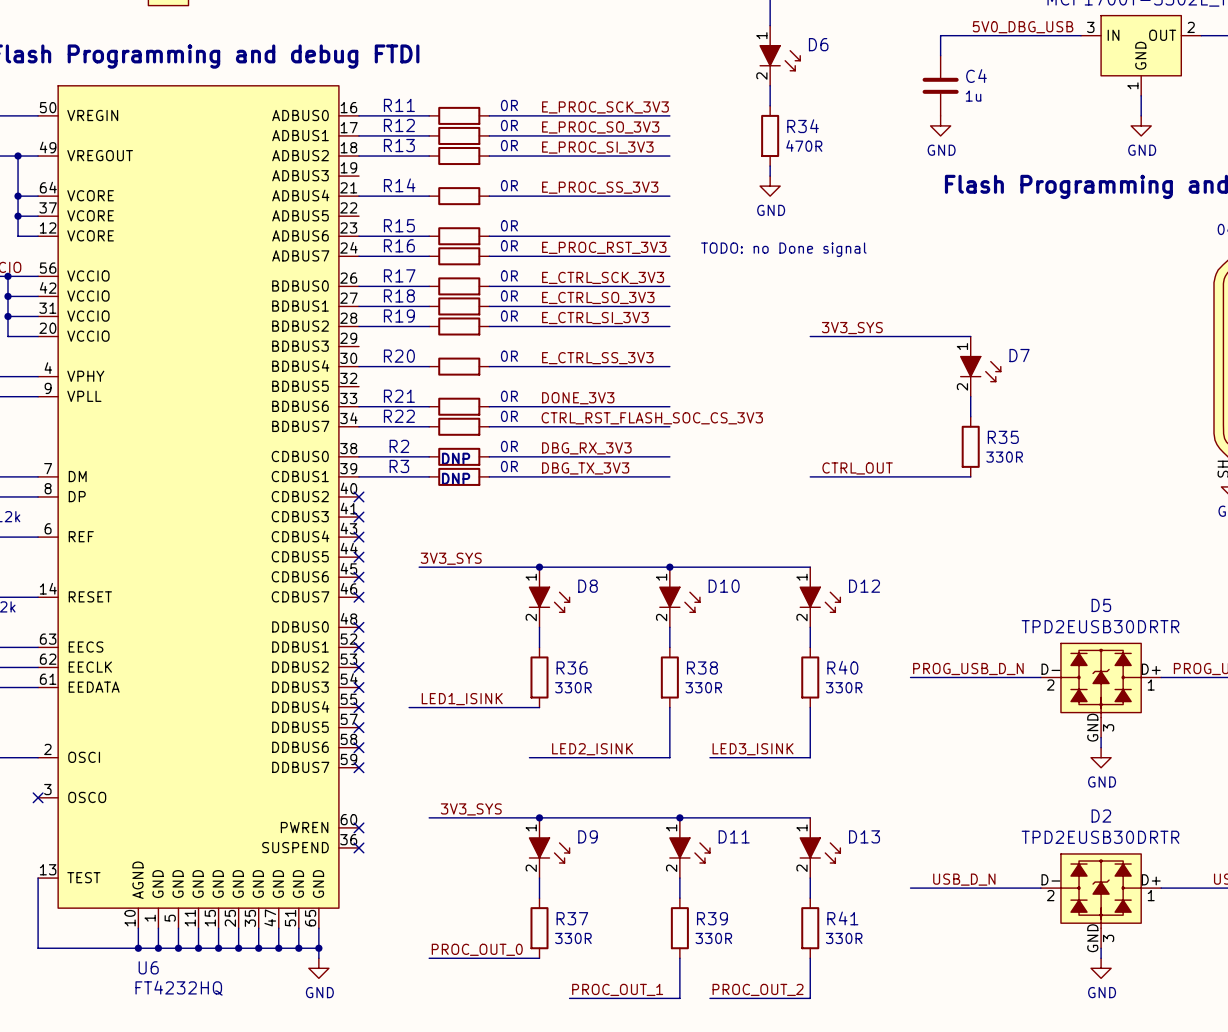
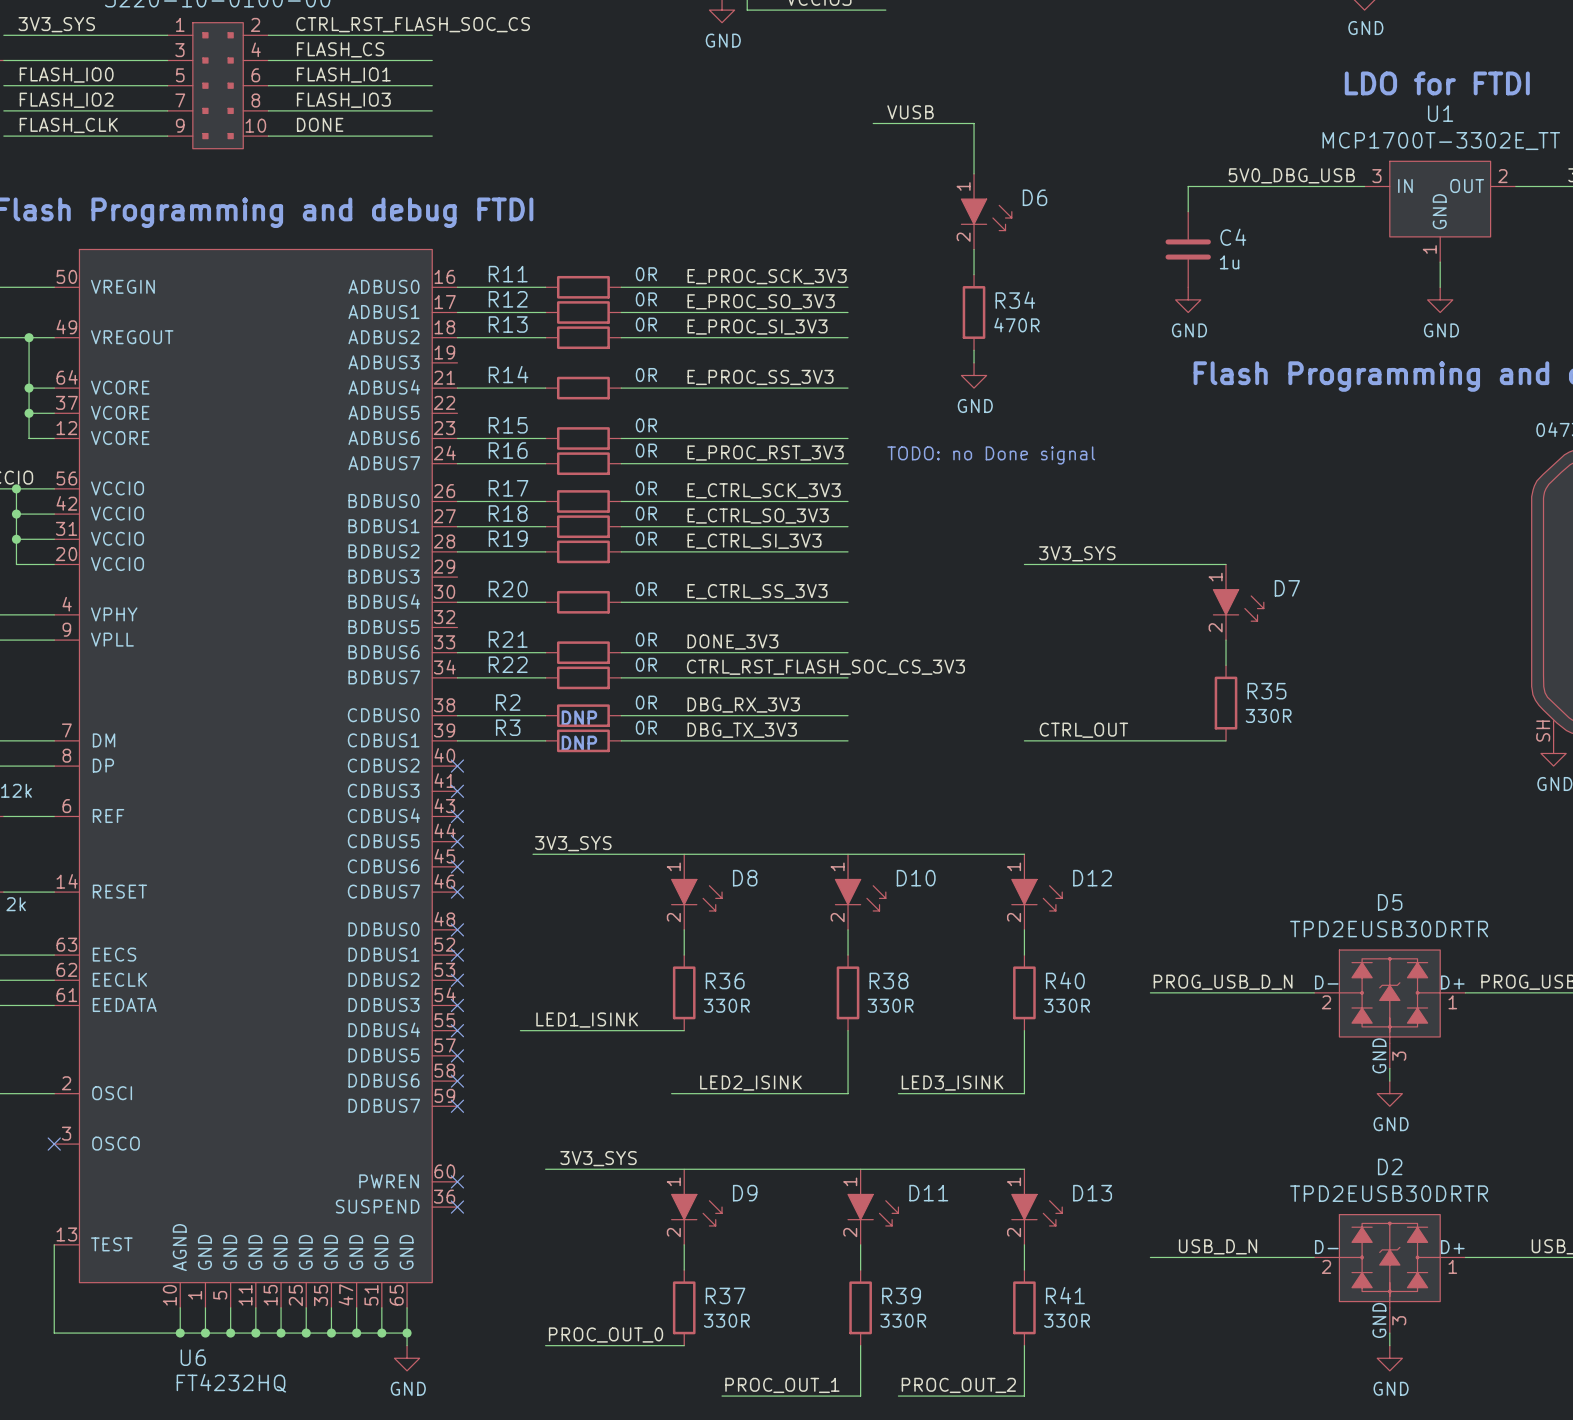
junction: (539, 567) -> none
junction: (669, 567) -> none
junction: (539, 817) -> none
junction: (679, 817) -> none

